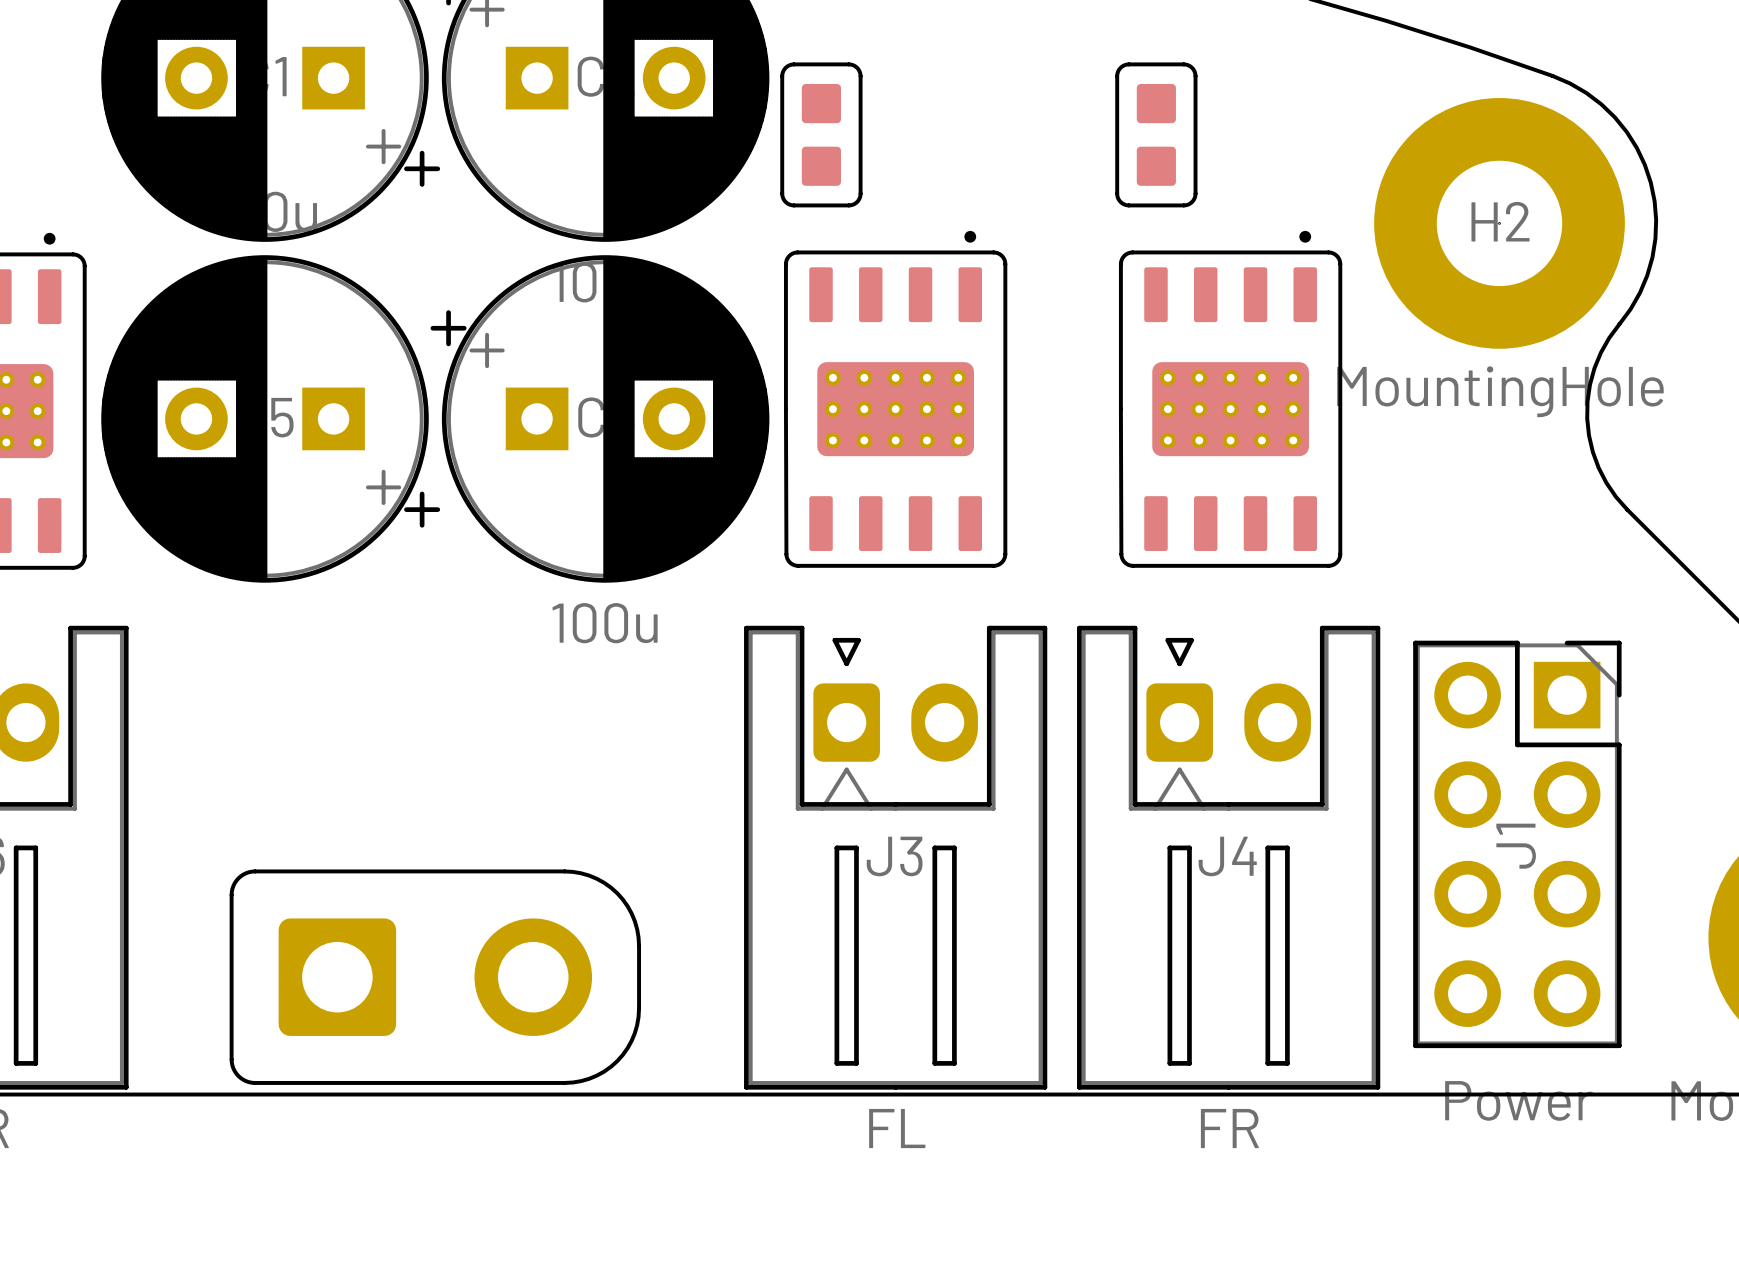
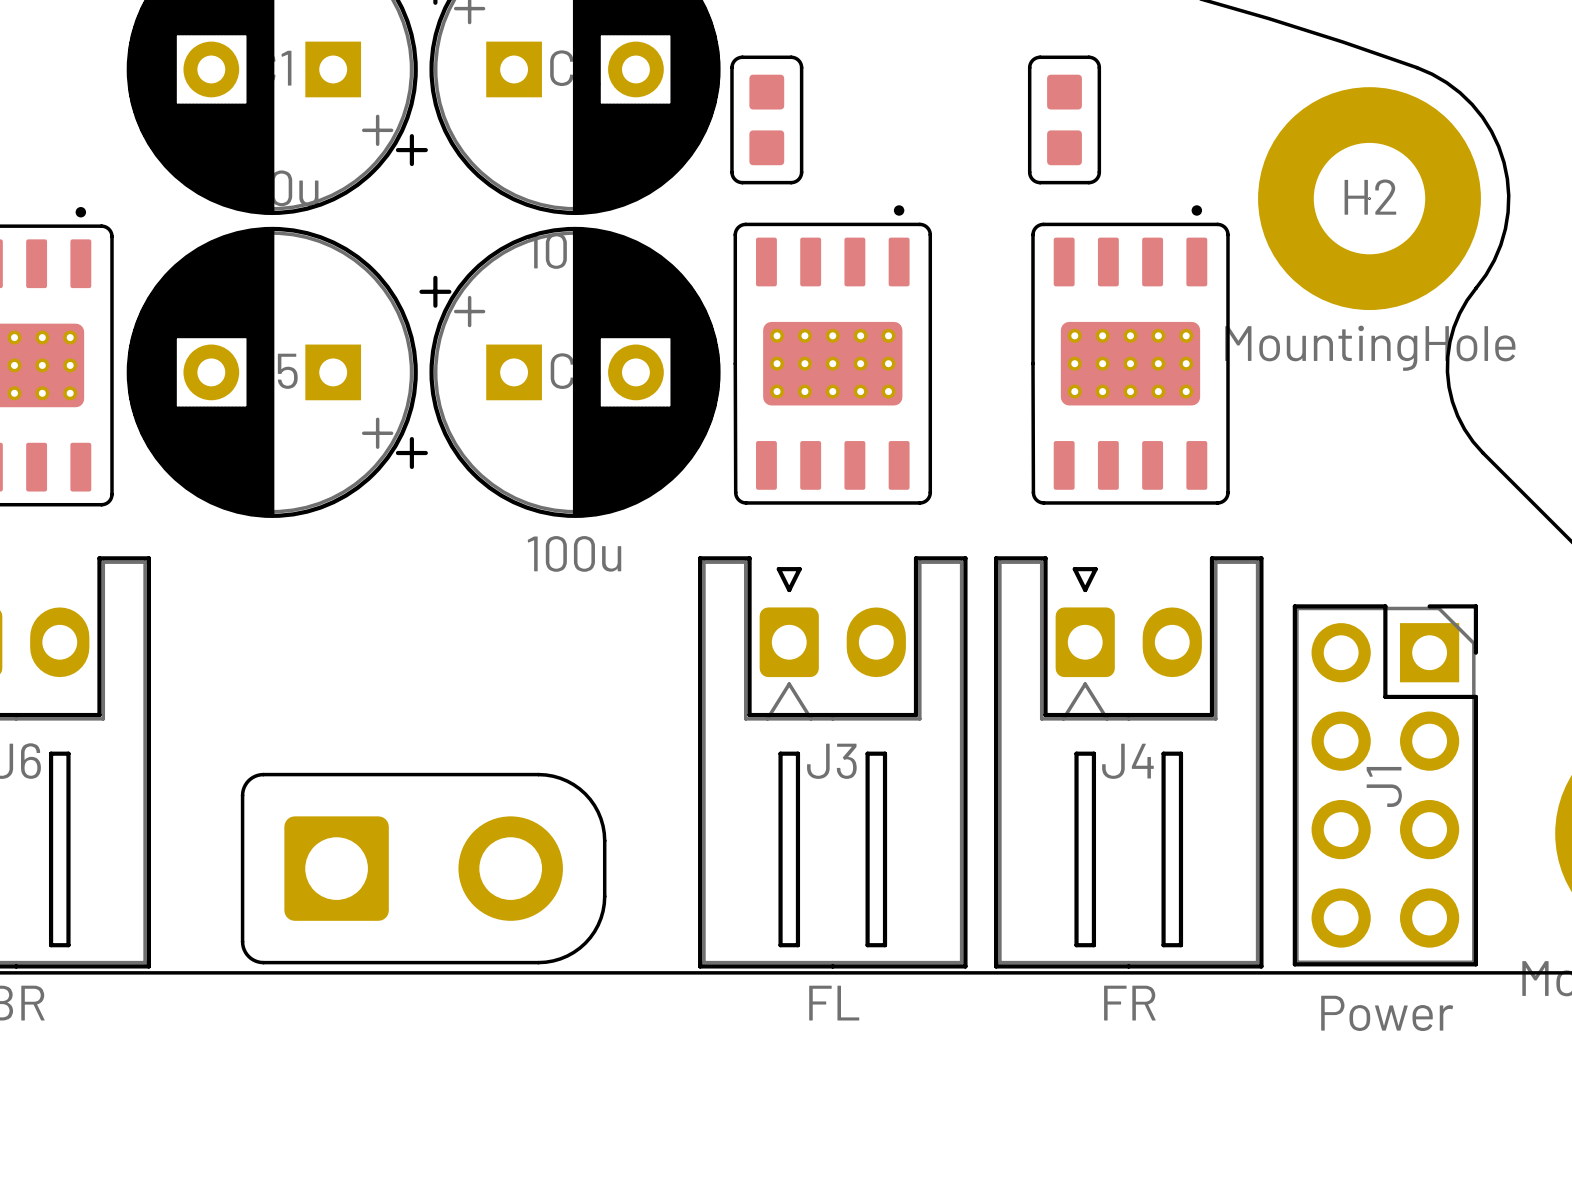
J1 position: (1517, 844) -> (1385, 785)

